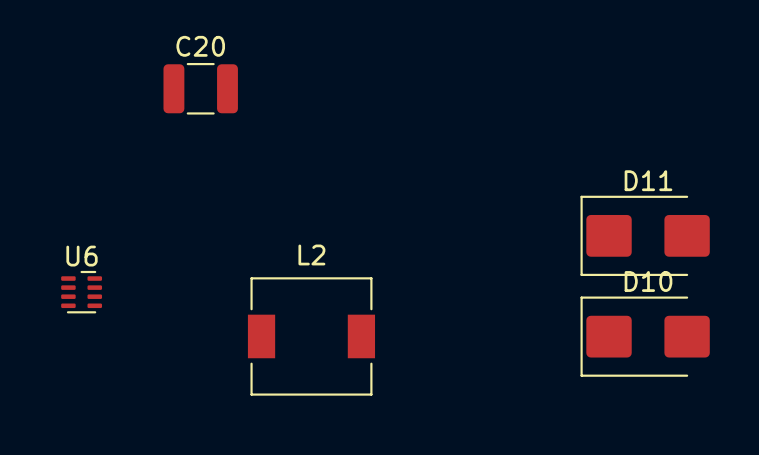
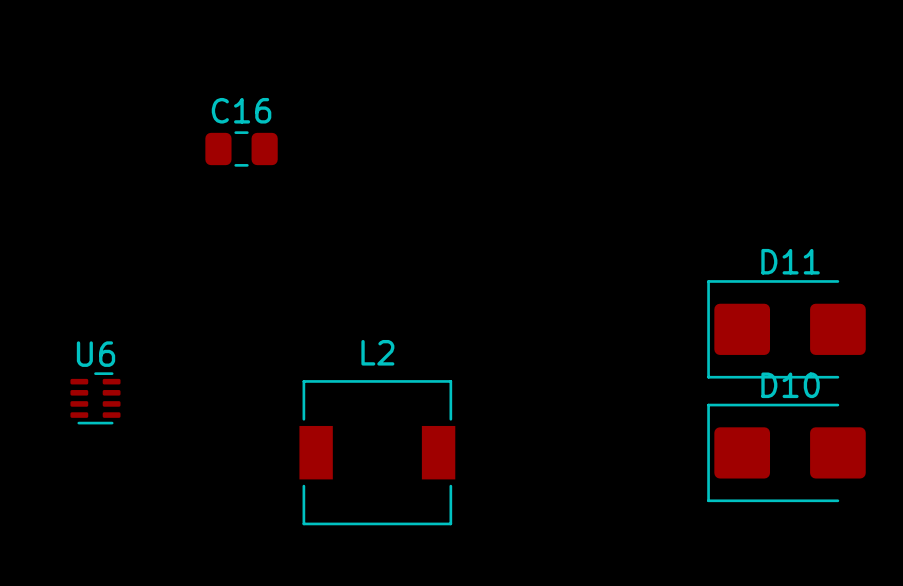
C20: (200, 88) -> none
C16: none -> (241, 148)

